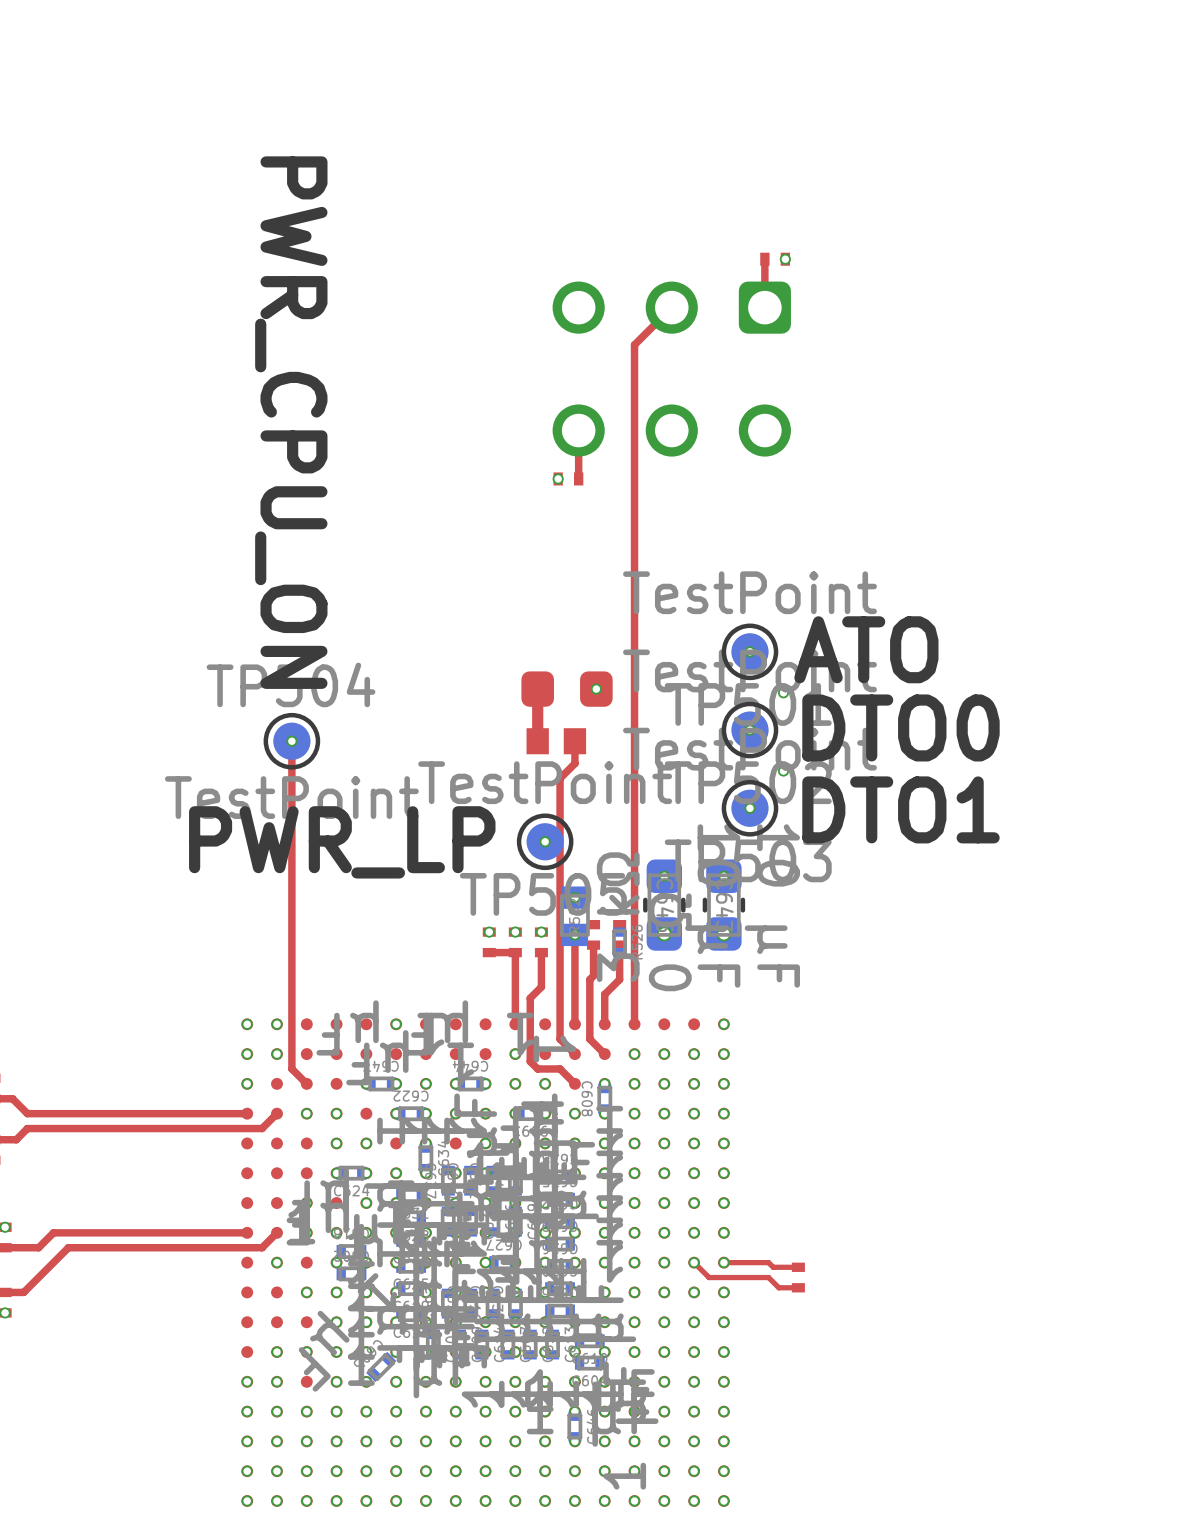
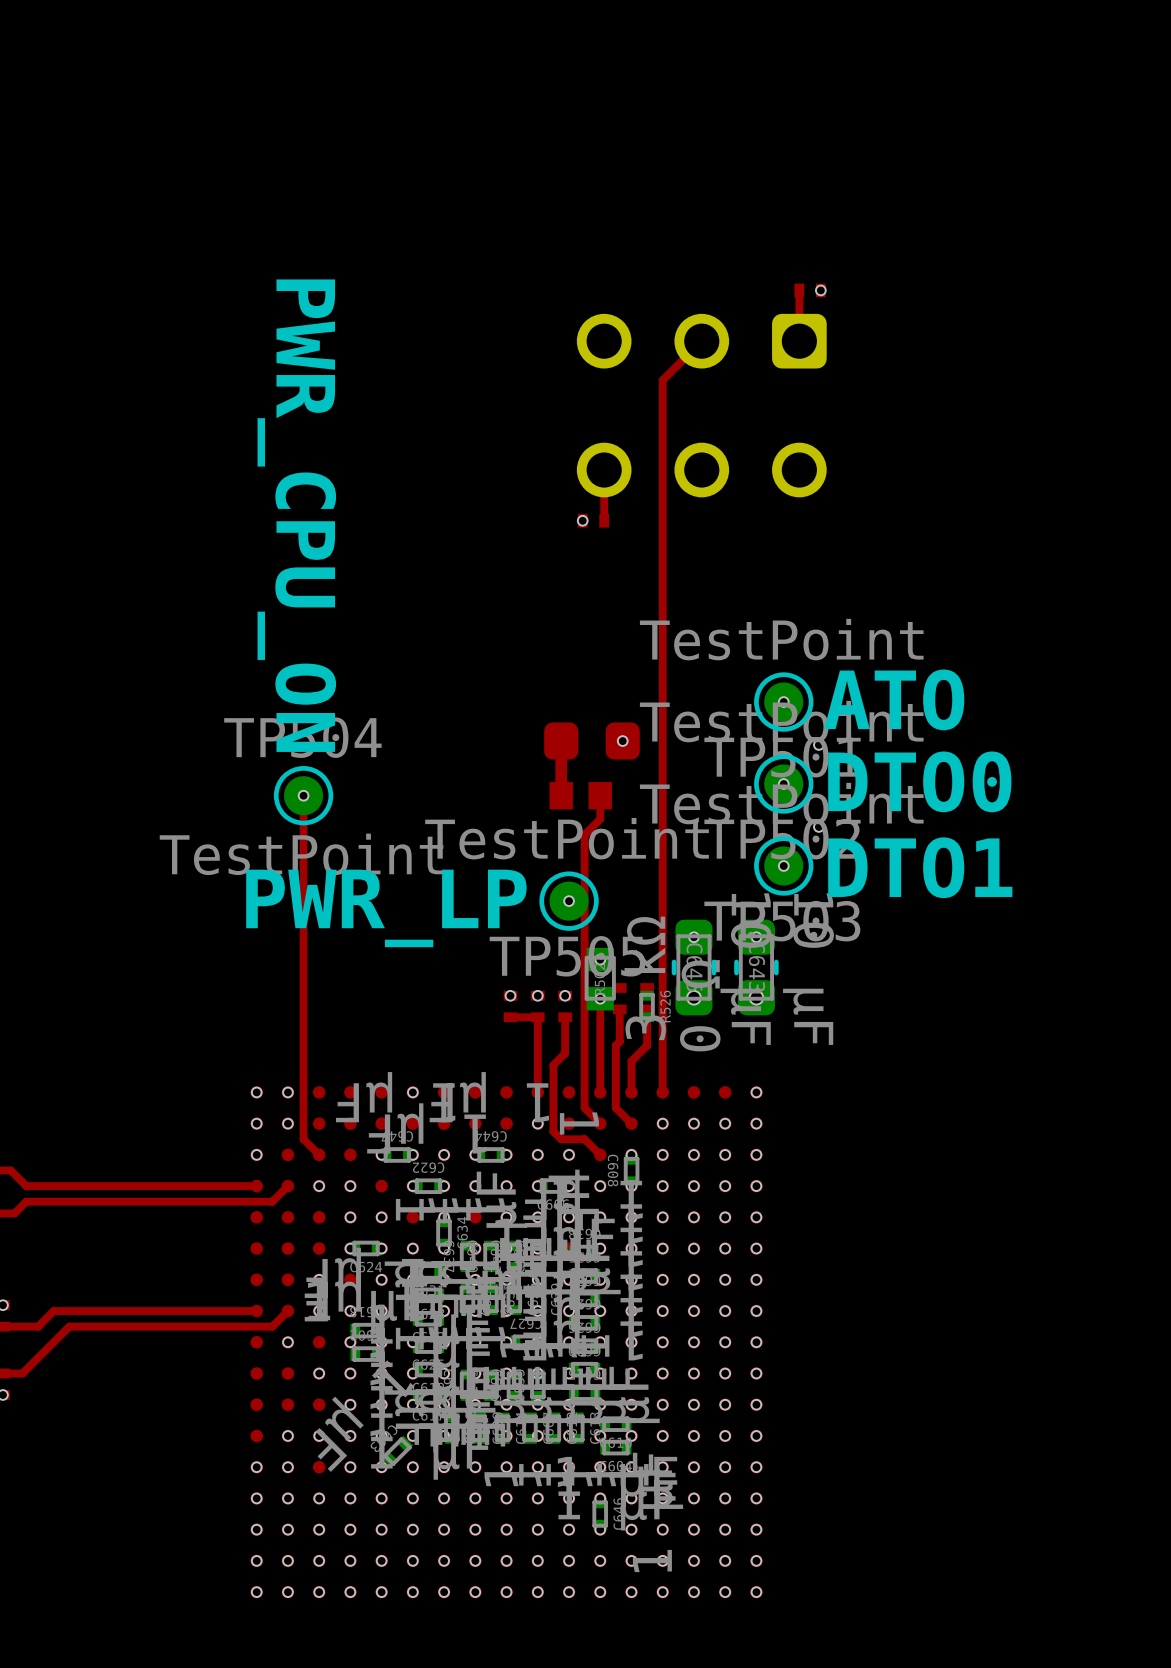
top track: (694, 1262) (709, 1277) (768, 1277) (778, 1287) (798, 1287) -> none
top track: (723, 1262) (768, 1262) (773, 1267) (798, 1267) -> none
part: (798, 1277) -> none

